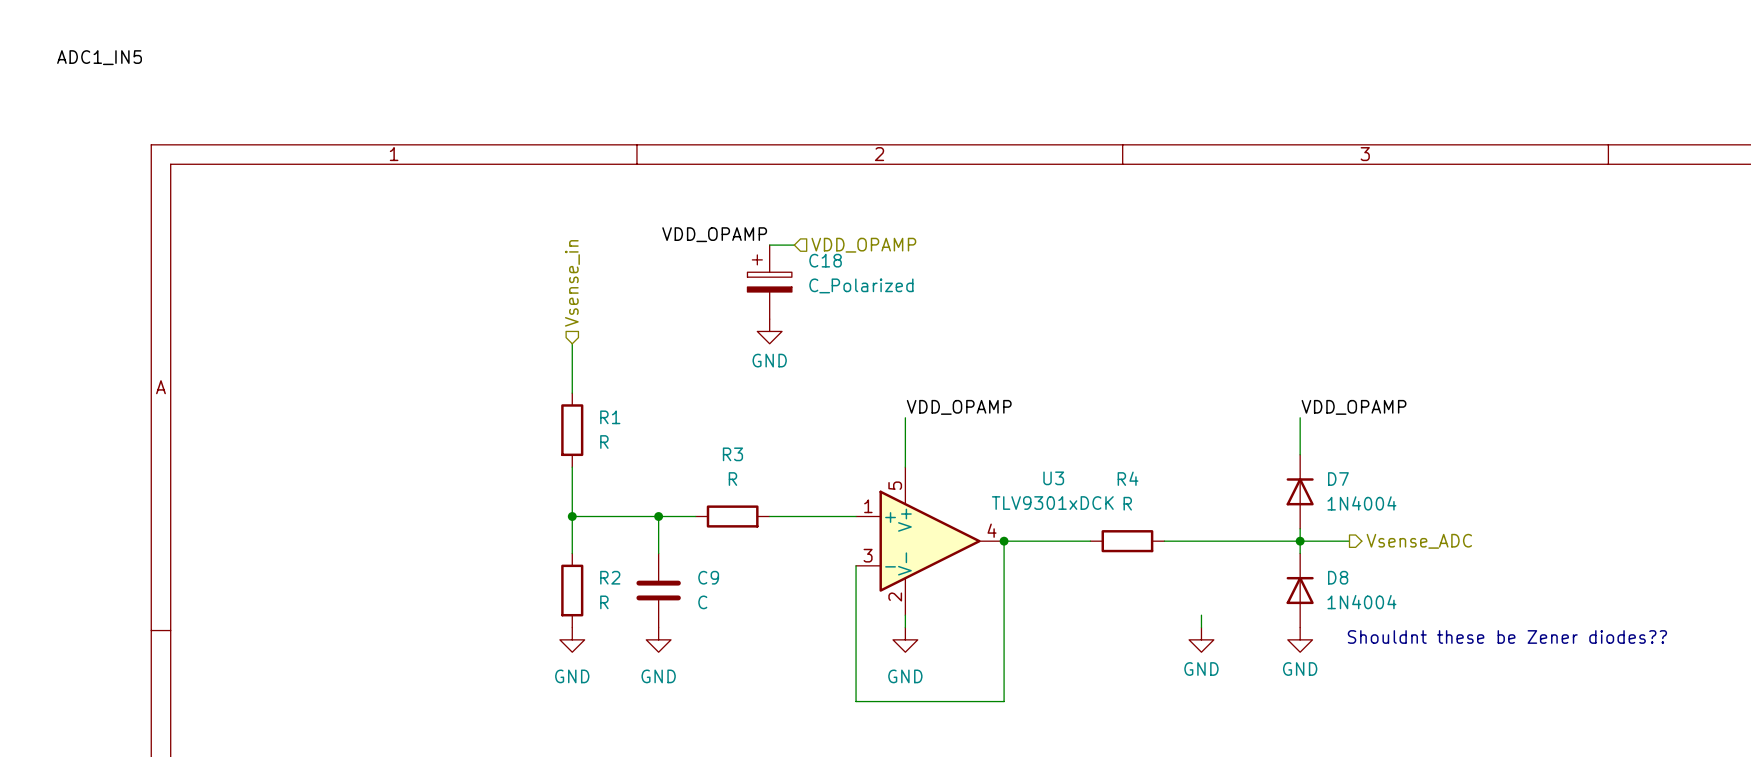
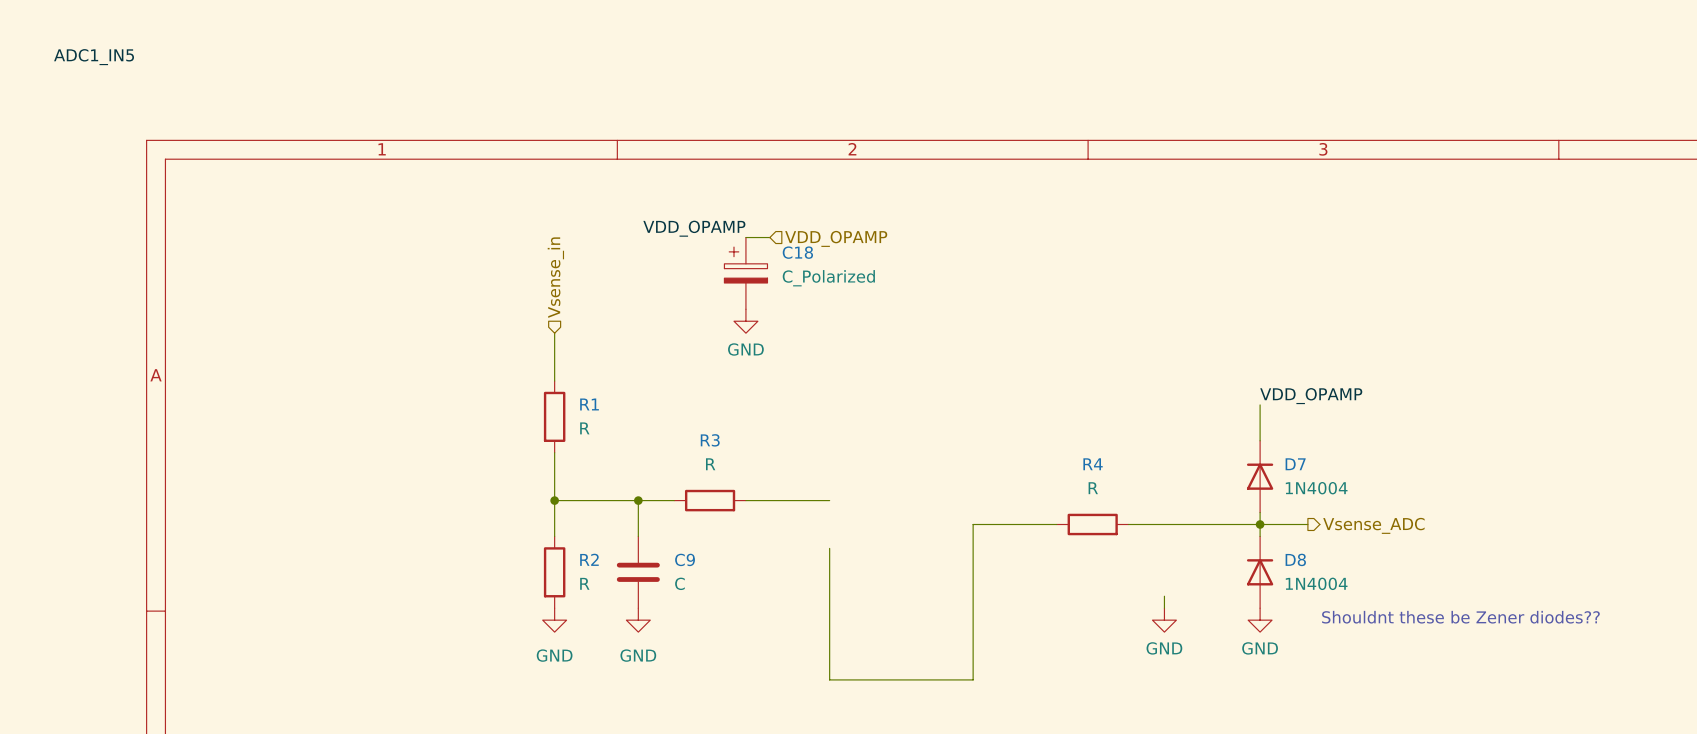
label: VDD_OPAMP (959, 407) -> none
wire: (905, 417) (905, 467) -> none
U3: TLV9301xDCK (930, 541) -> none
junction: (1004, 541) -> none
wire: (905, 615) (905, 627) -> none
power symbol: GND (905, 639) -> none

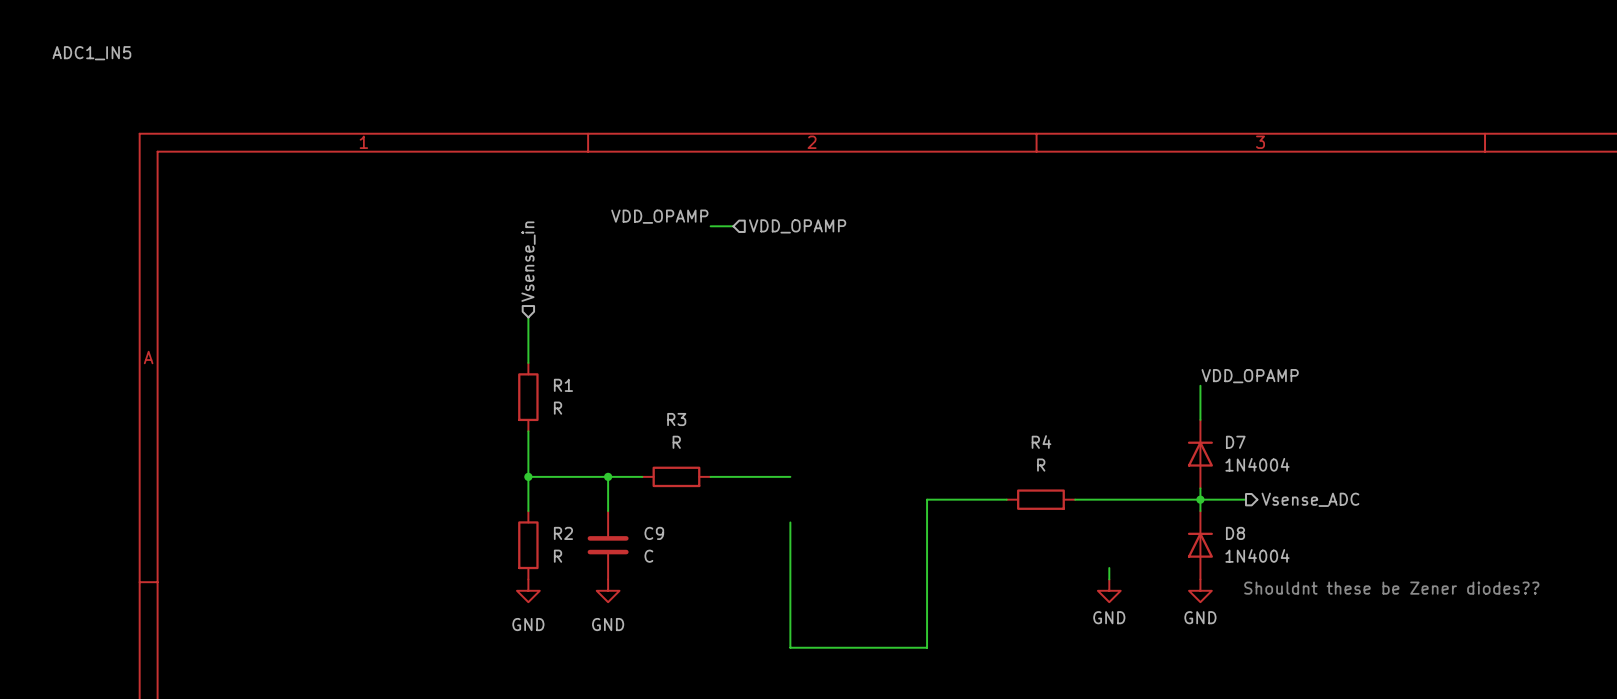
C18: C_Polarized (745, 273) -> none
power symbol: GND (745, 321) -> none

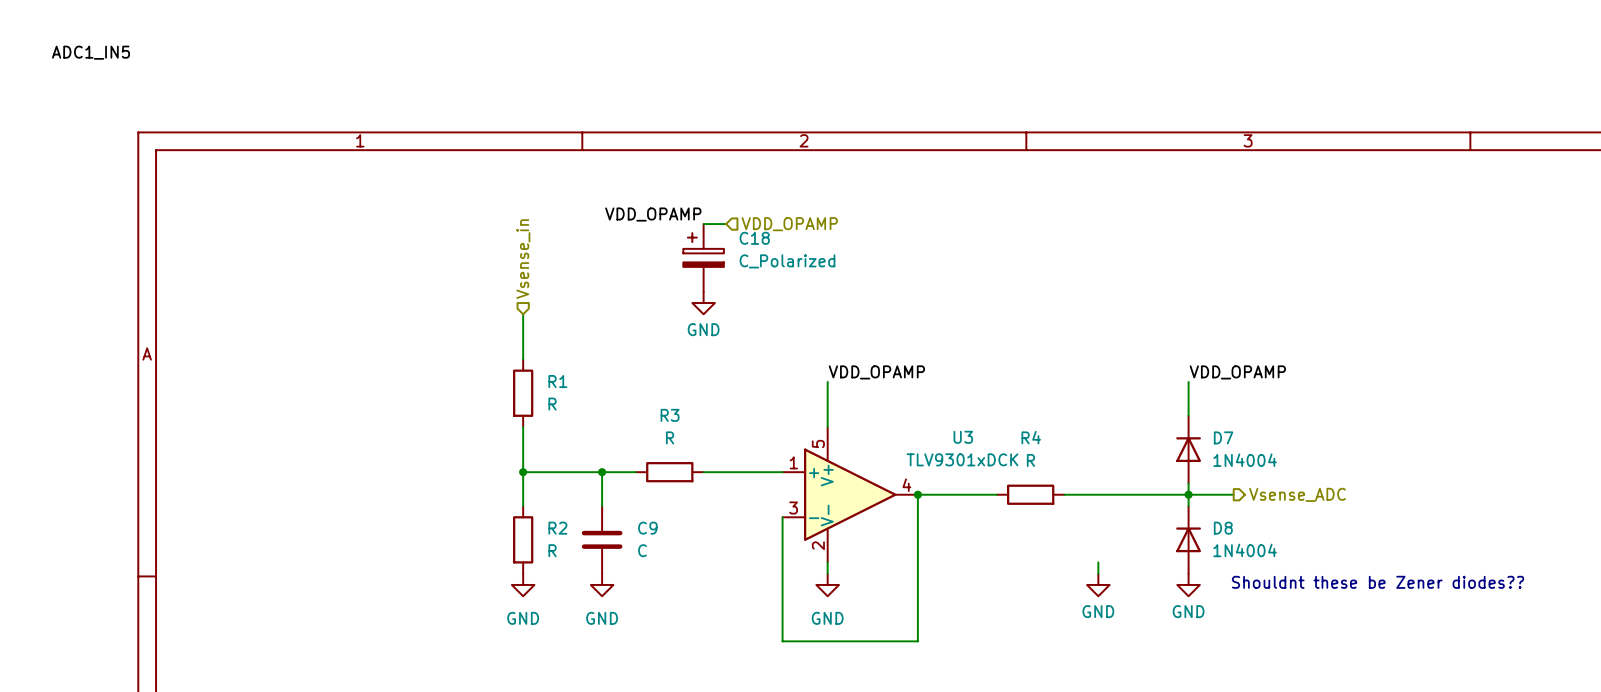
C18: none -> C_Polarized (703, 257)
power symbol: none -> GND (703, 303)
label: none -> VDD_OPAMP (876, 372)
wire: none -> (827, 381) (827, 427)
U3: none -> TLV9301xDCK (850, 494)
junction: none -> (917, 494)
wire: none -> (827, 562) (827, 573)
power symbol: none -> GND (827, 584)

